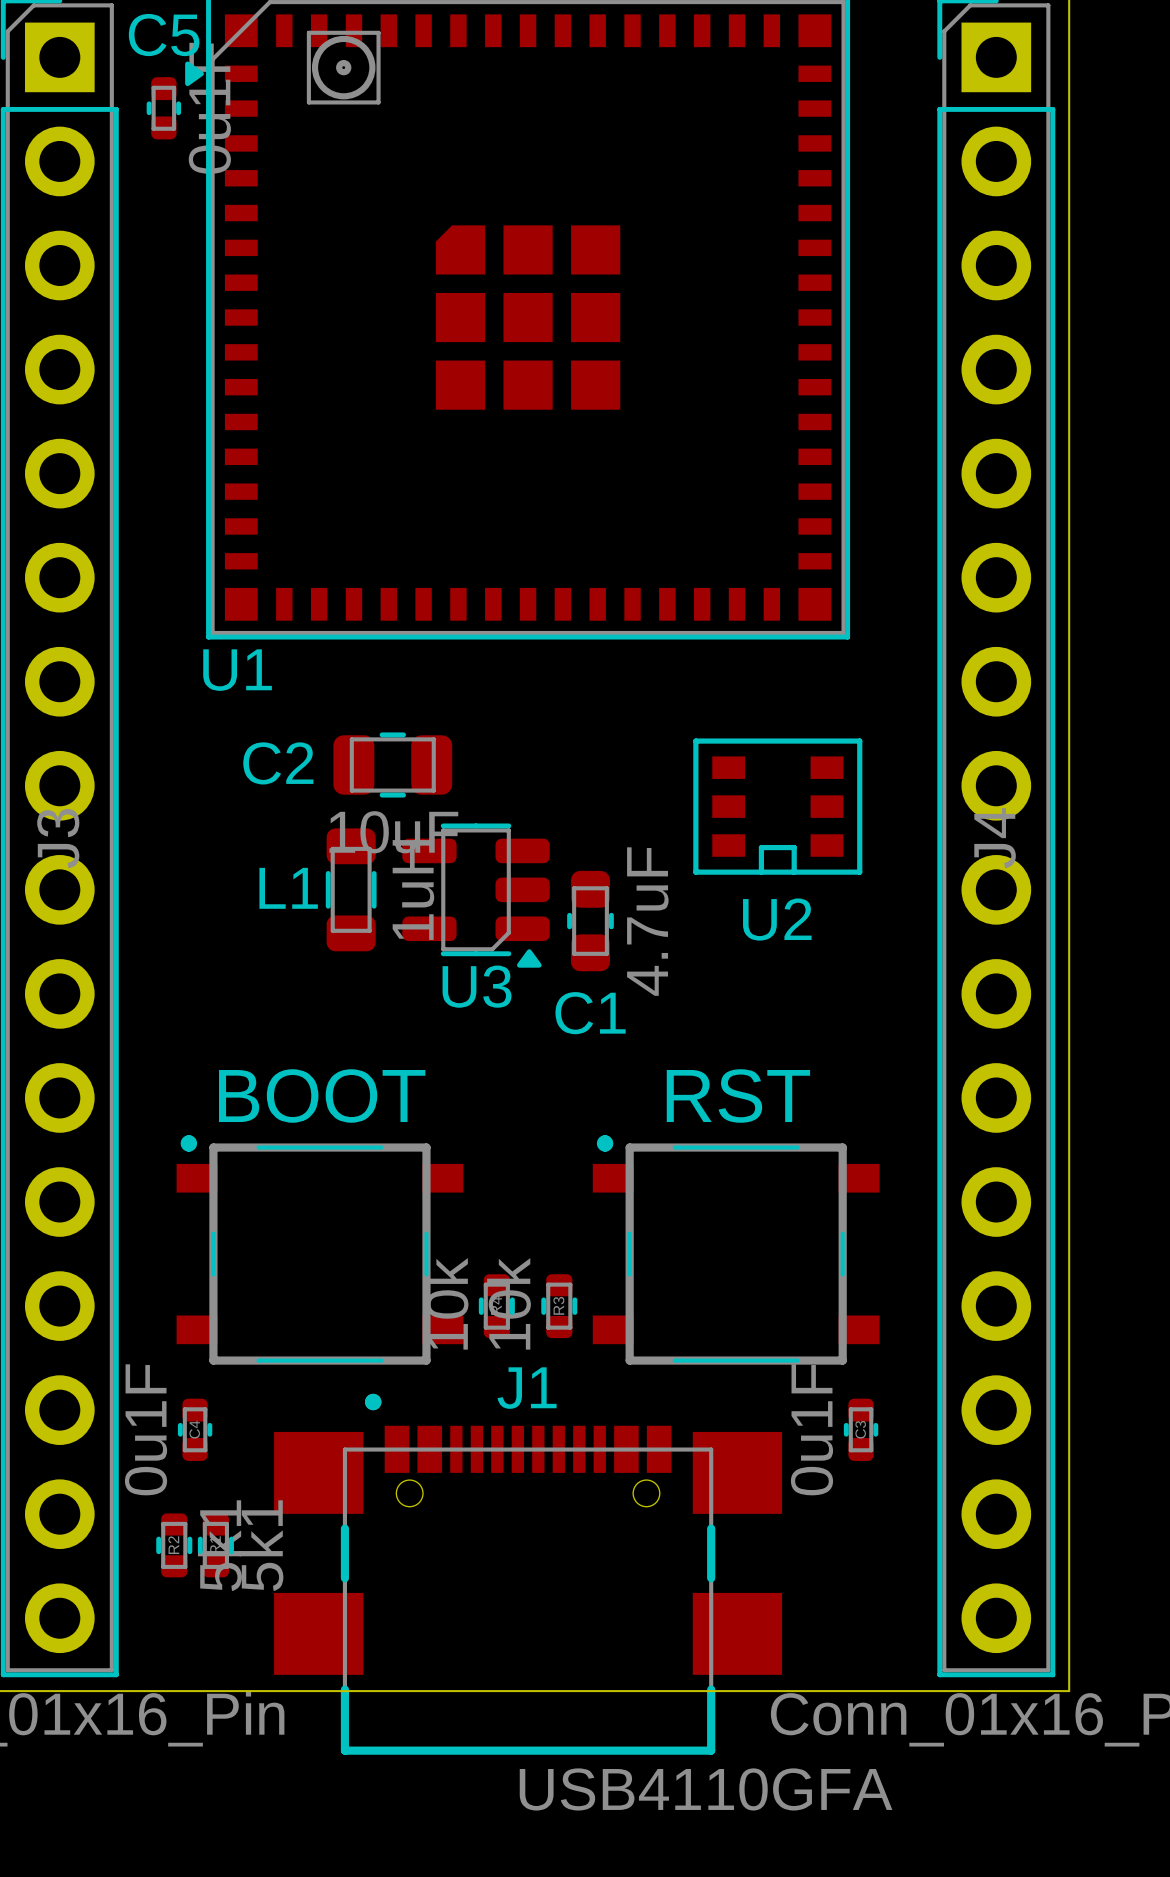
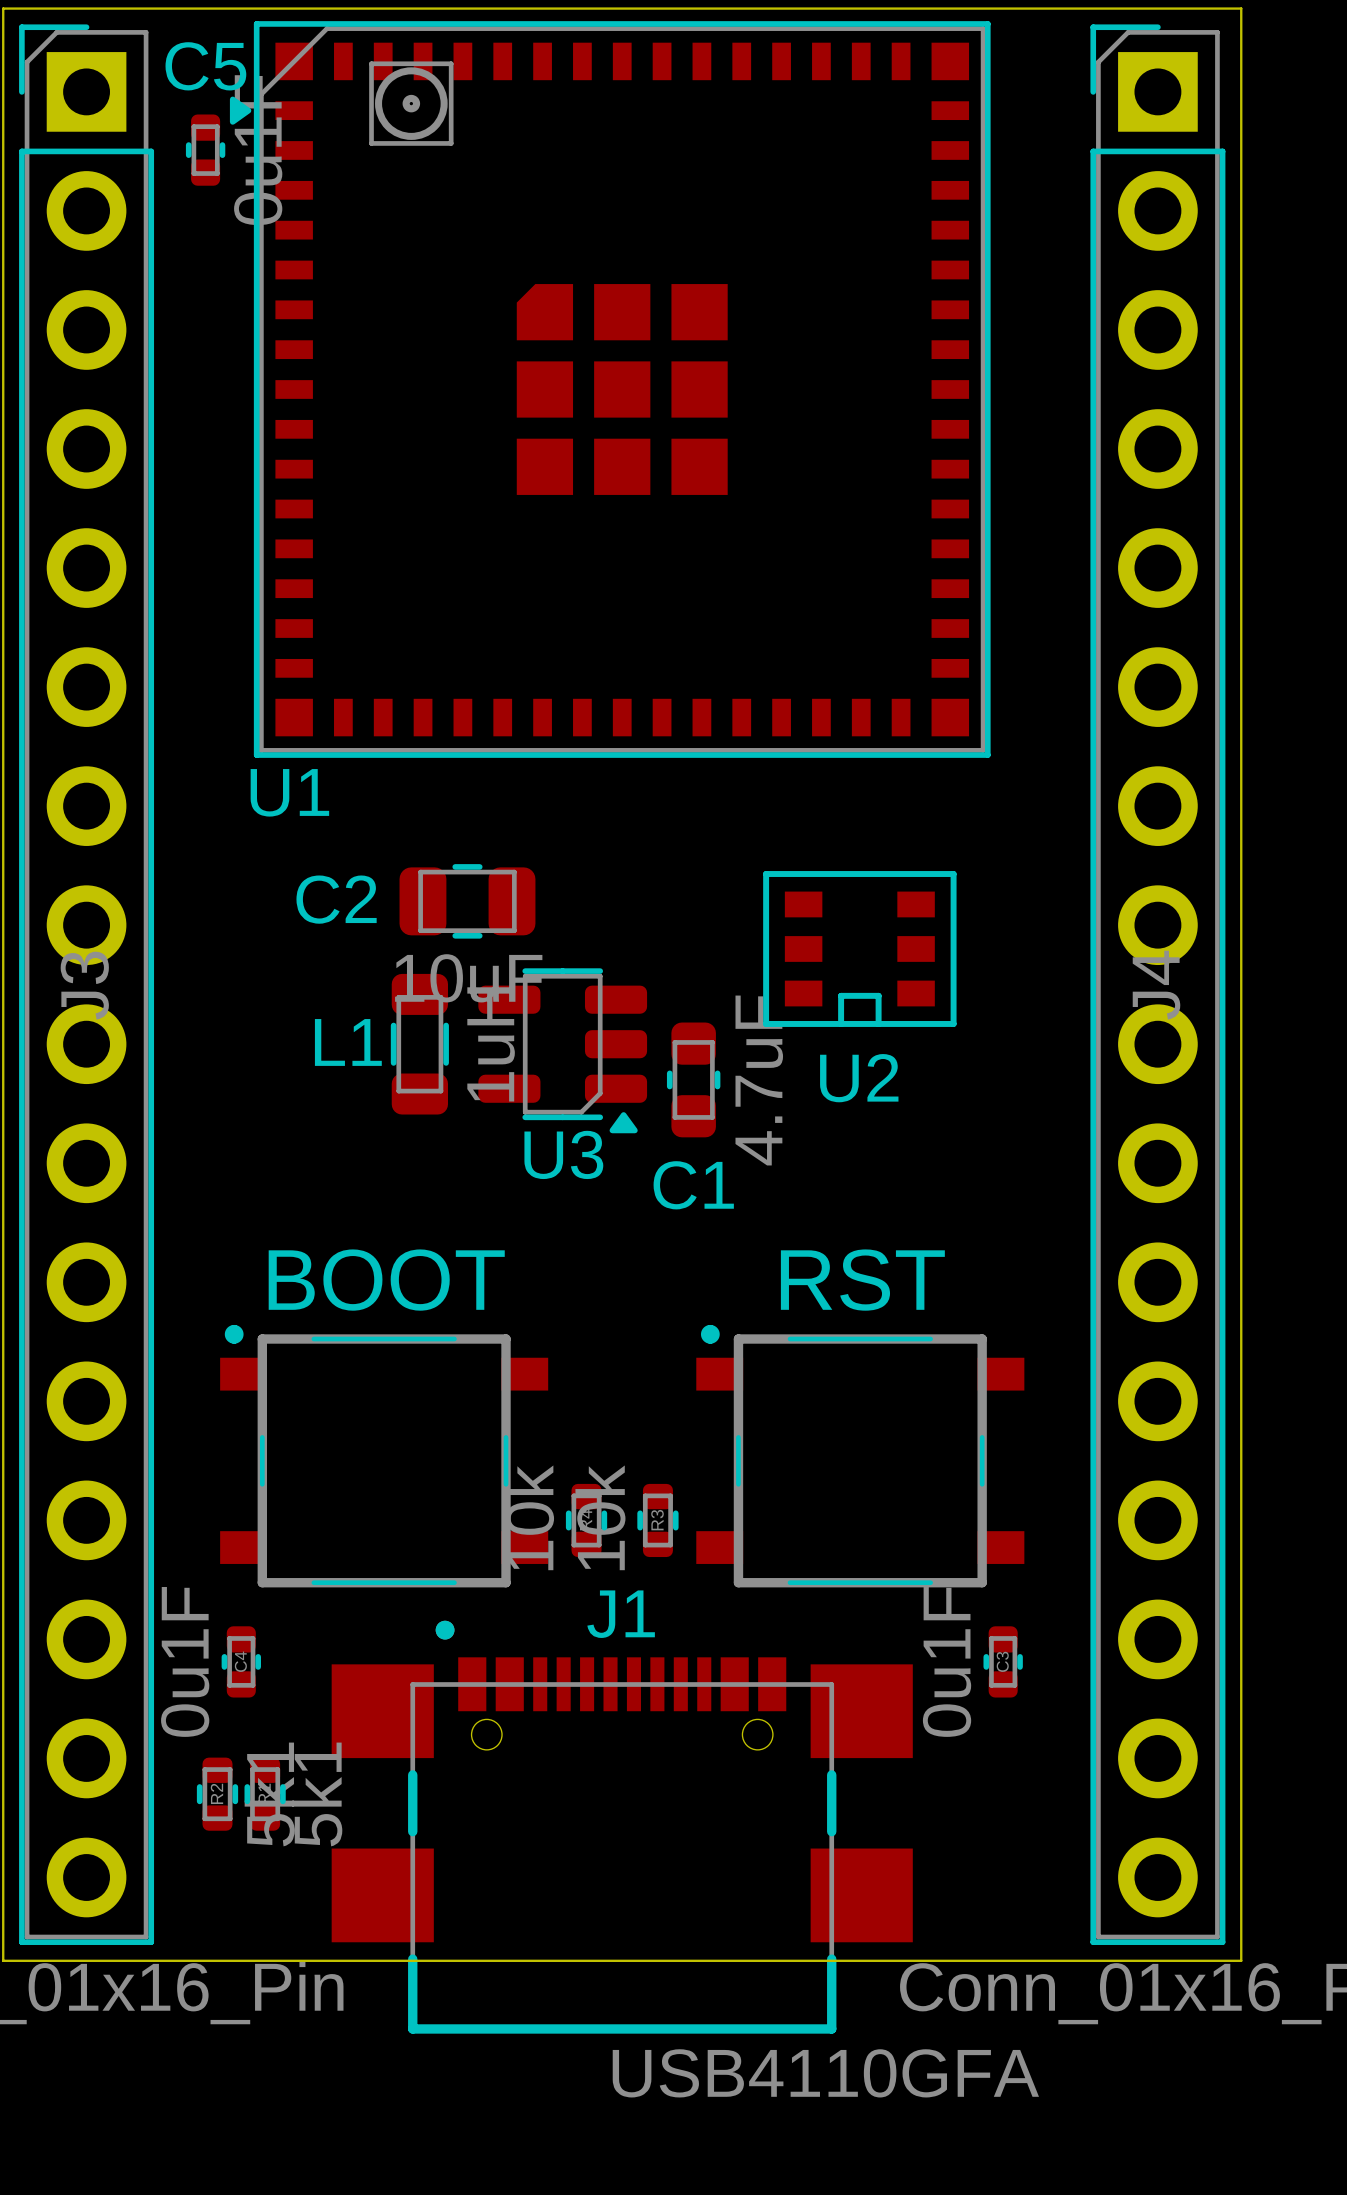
U2 position: (777, 806) -> (859, 948)

